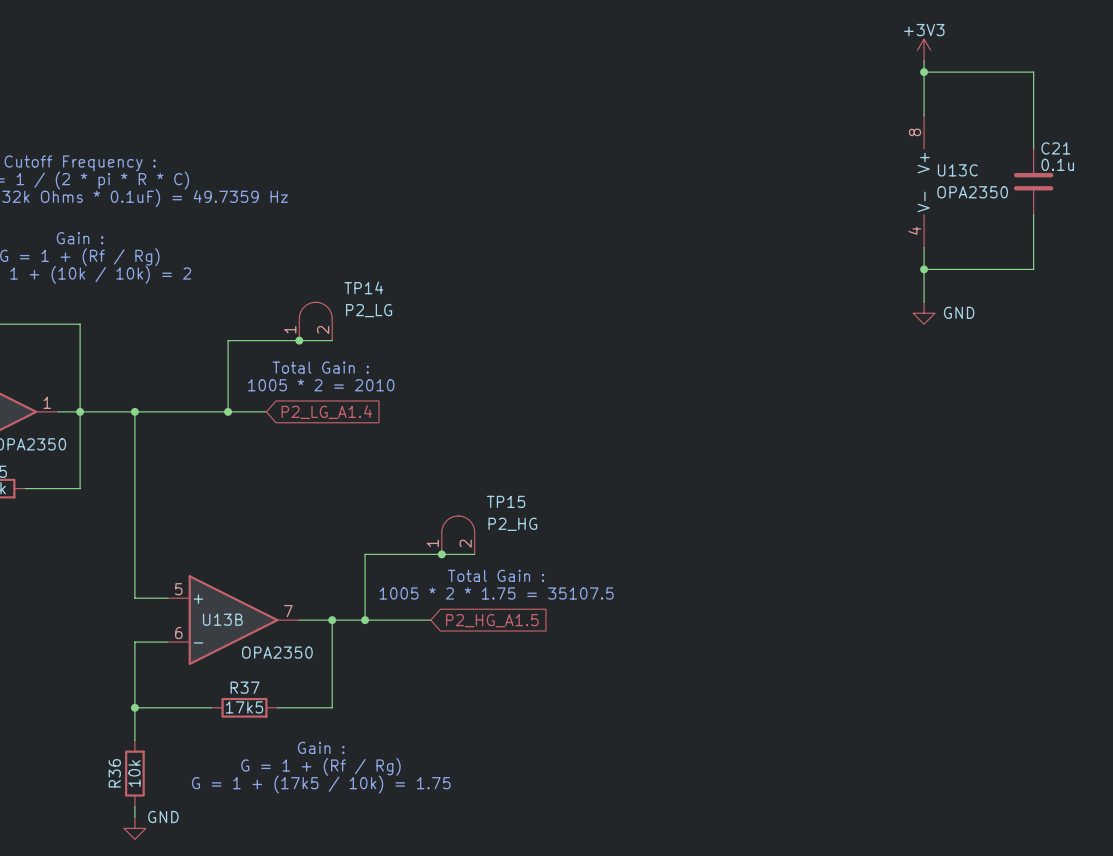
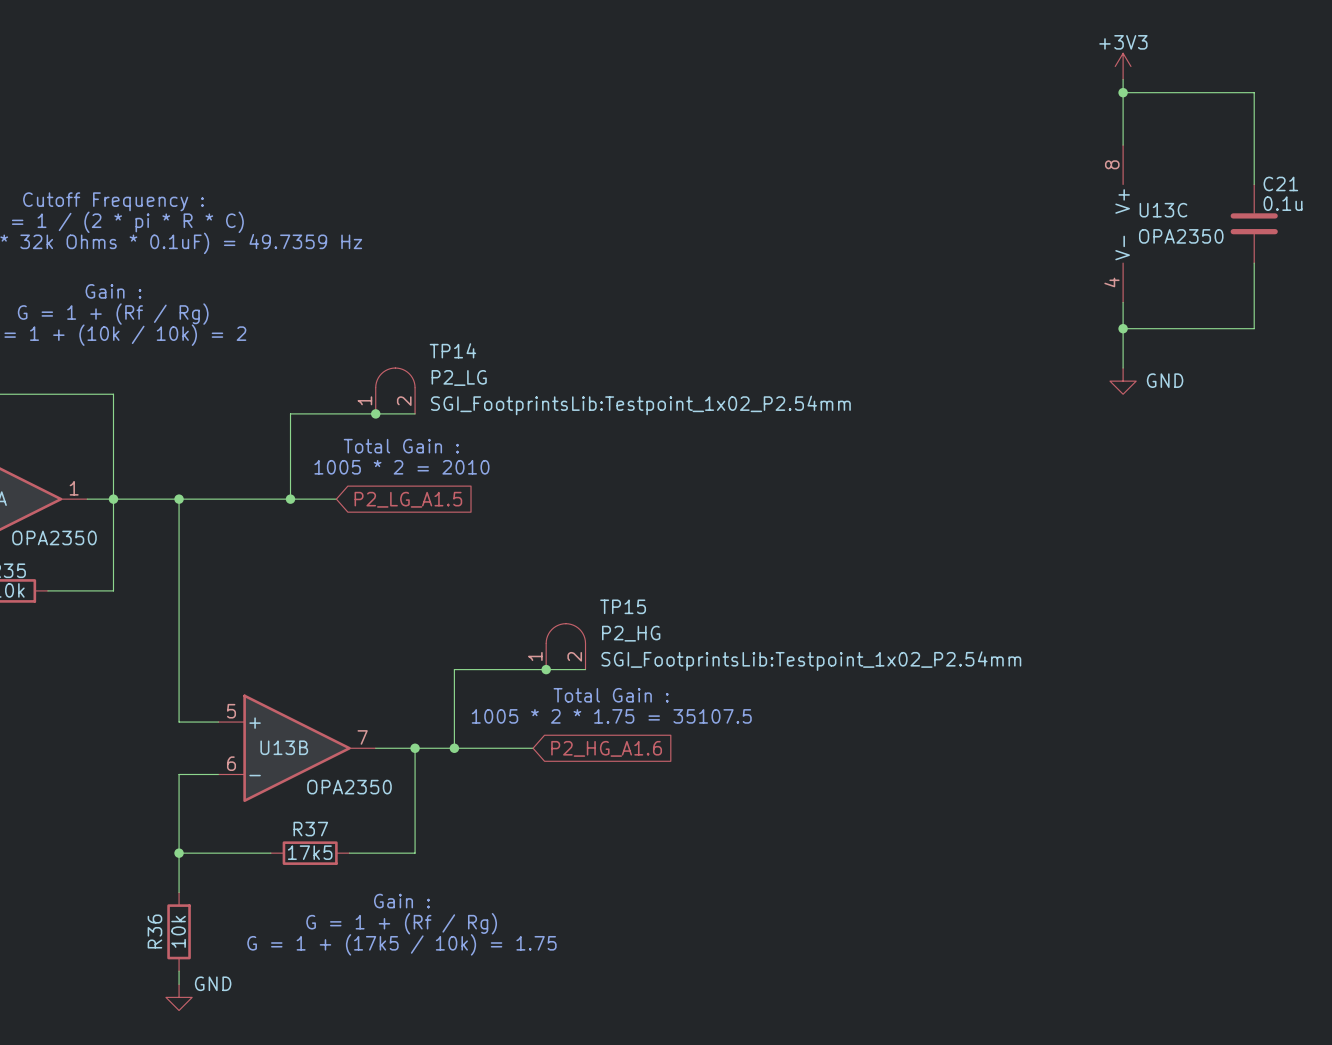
TP14 text: none -> SGI_FootprintsLib:Testpoint_1x02_P2.54mm (640, 405)
global label: P2_LG_A1.4 (326, 412) -> P2_LG_A1.5 (408, 499)
TP15 text: none -> SGI_FootprintsLib:Testpoint_1x02_P2.54mm (811, 661)
global label: P2_HG_A1.5 (492, 620) -> P2_HG_A1.6 (606, 748)

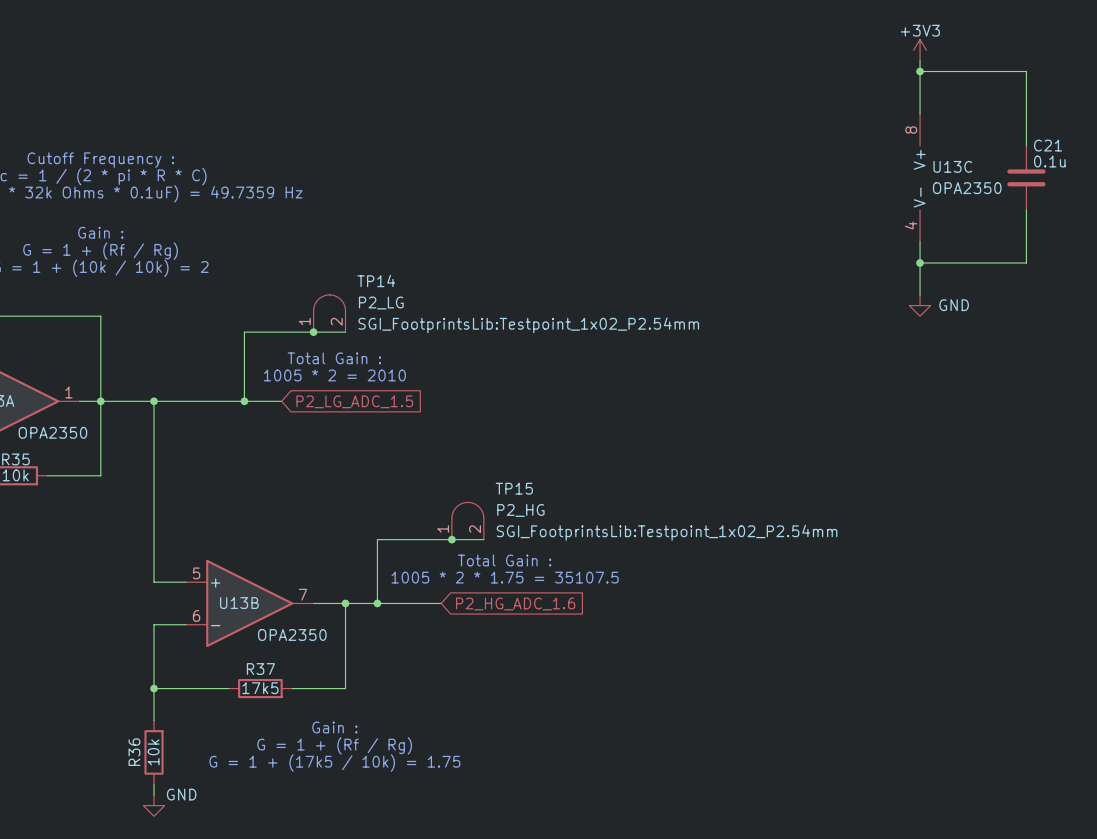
global label: P2_LG_A1.5 (408, 499) -> P2_LG_ADC_1.5 (354, 401)
global label: P2_HG_A1.6 (606, 748) -> P2_HG_ADC_1.6 (515, 603)

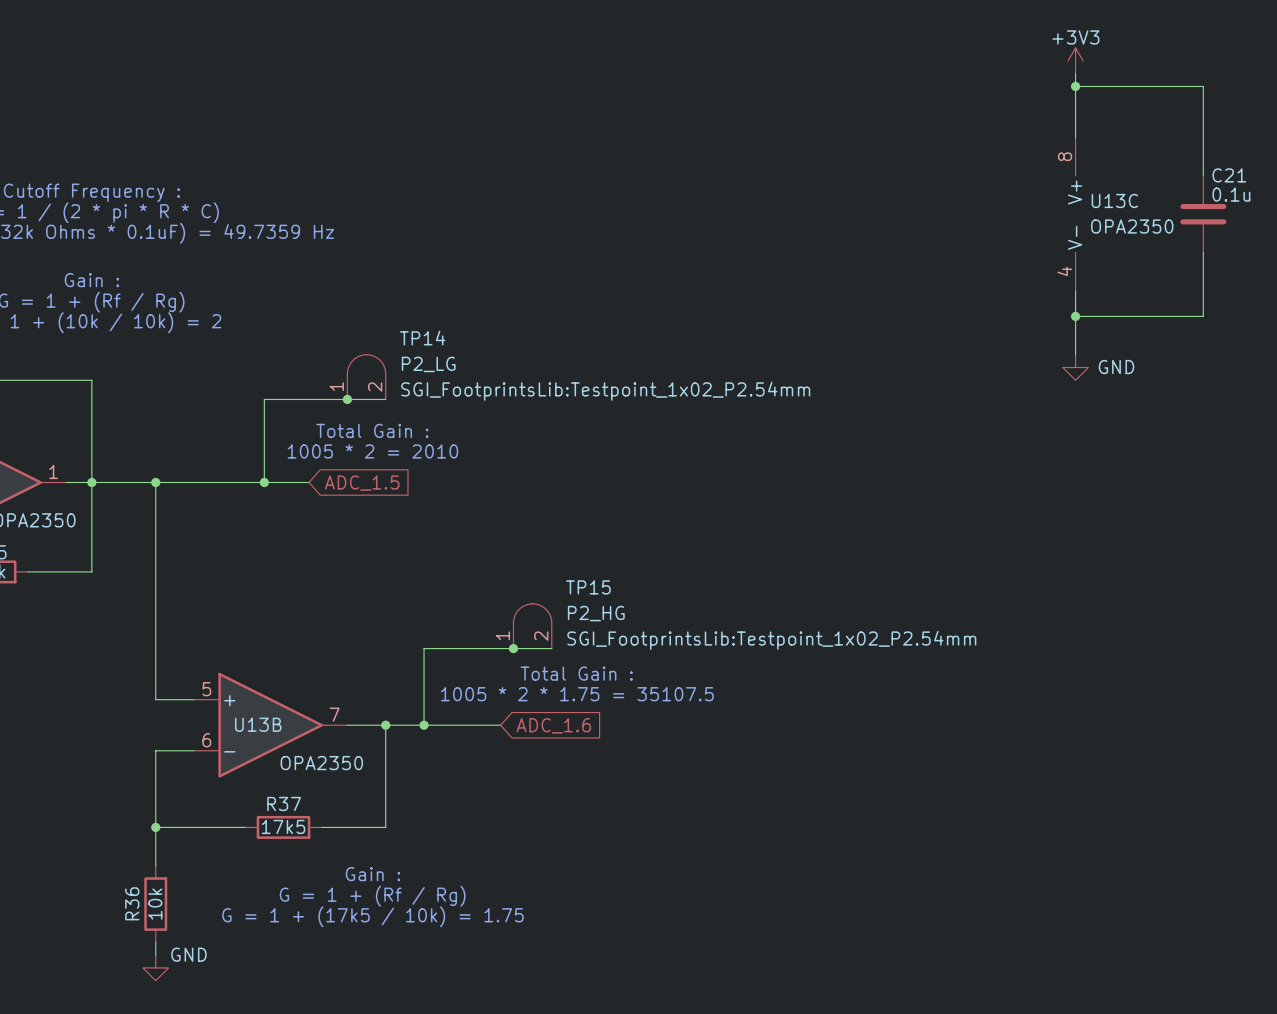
global label: P2_LG_ADC_1.5 (354, 401) -> ADC_1.5 (362, 483)
global label: P2_HG_ADC_1.6 (515, 603) -> ADC_1.6 (553, 725)

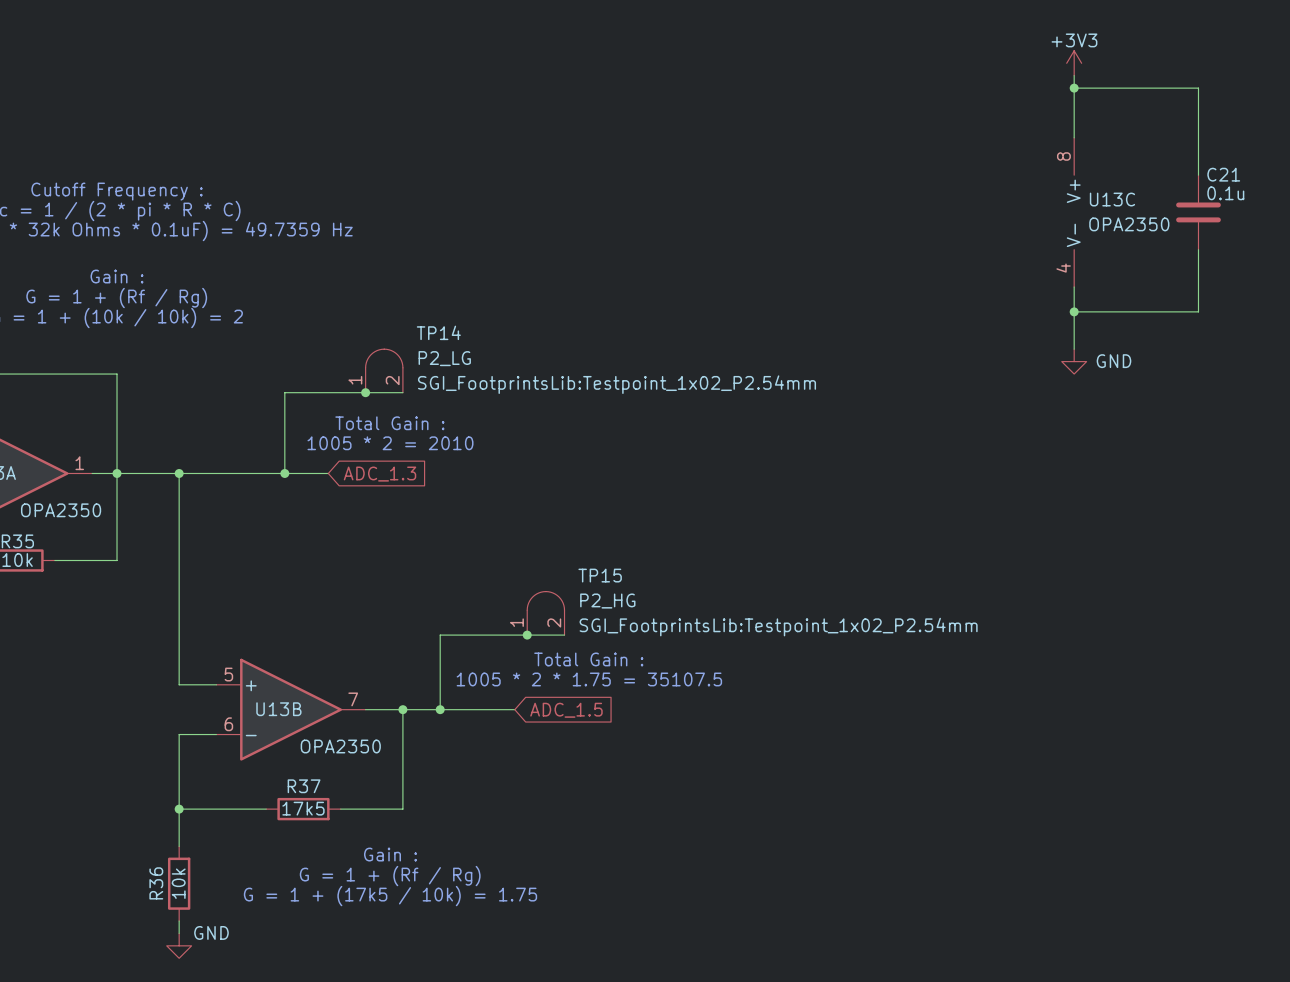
global label: ADC_1.5 (362, 483) -> ADC_1.3 (380, 474)
global label: ADC_1.6 (553, 725) -> ADC_1.5 (566, 710)

